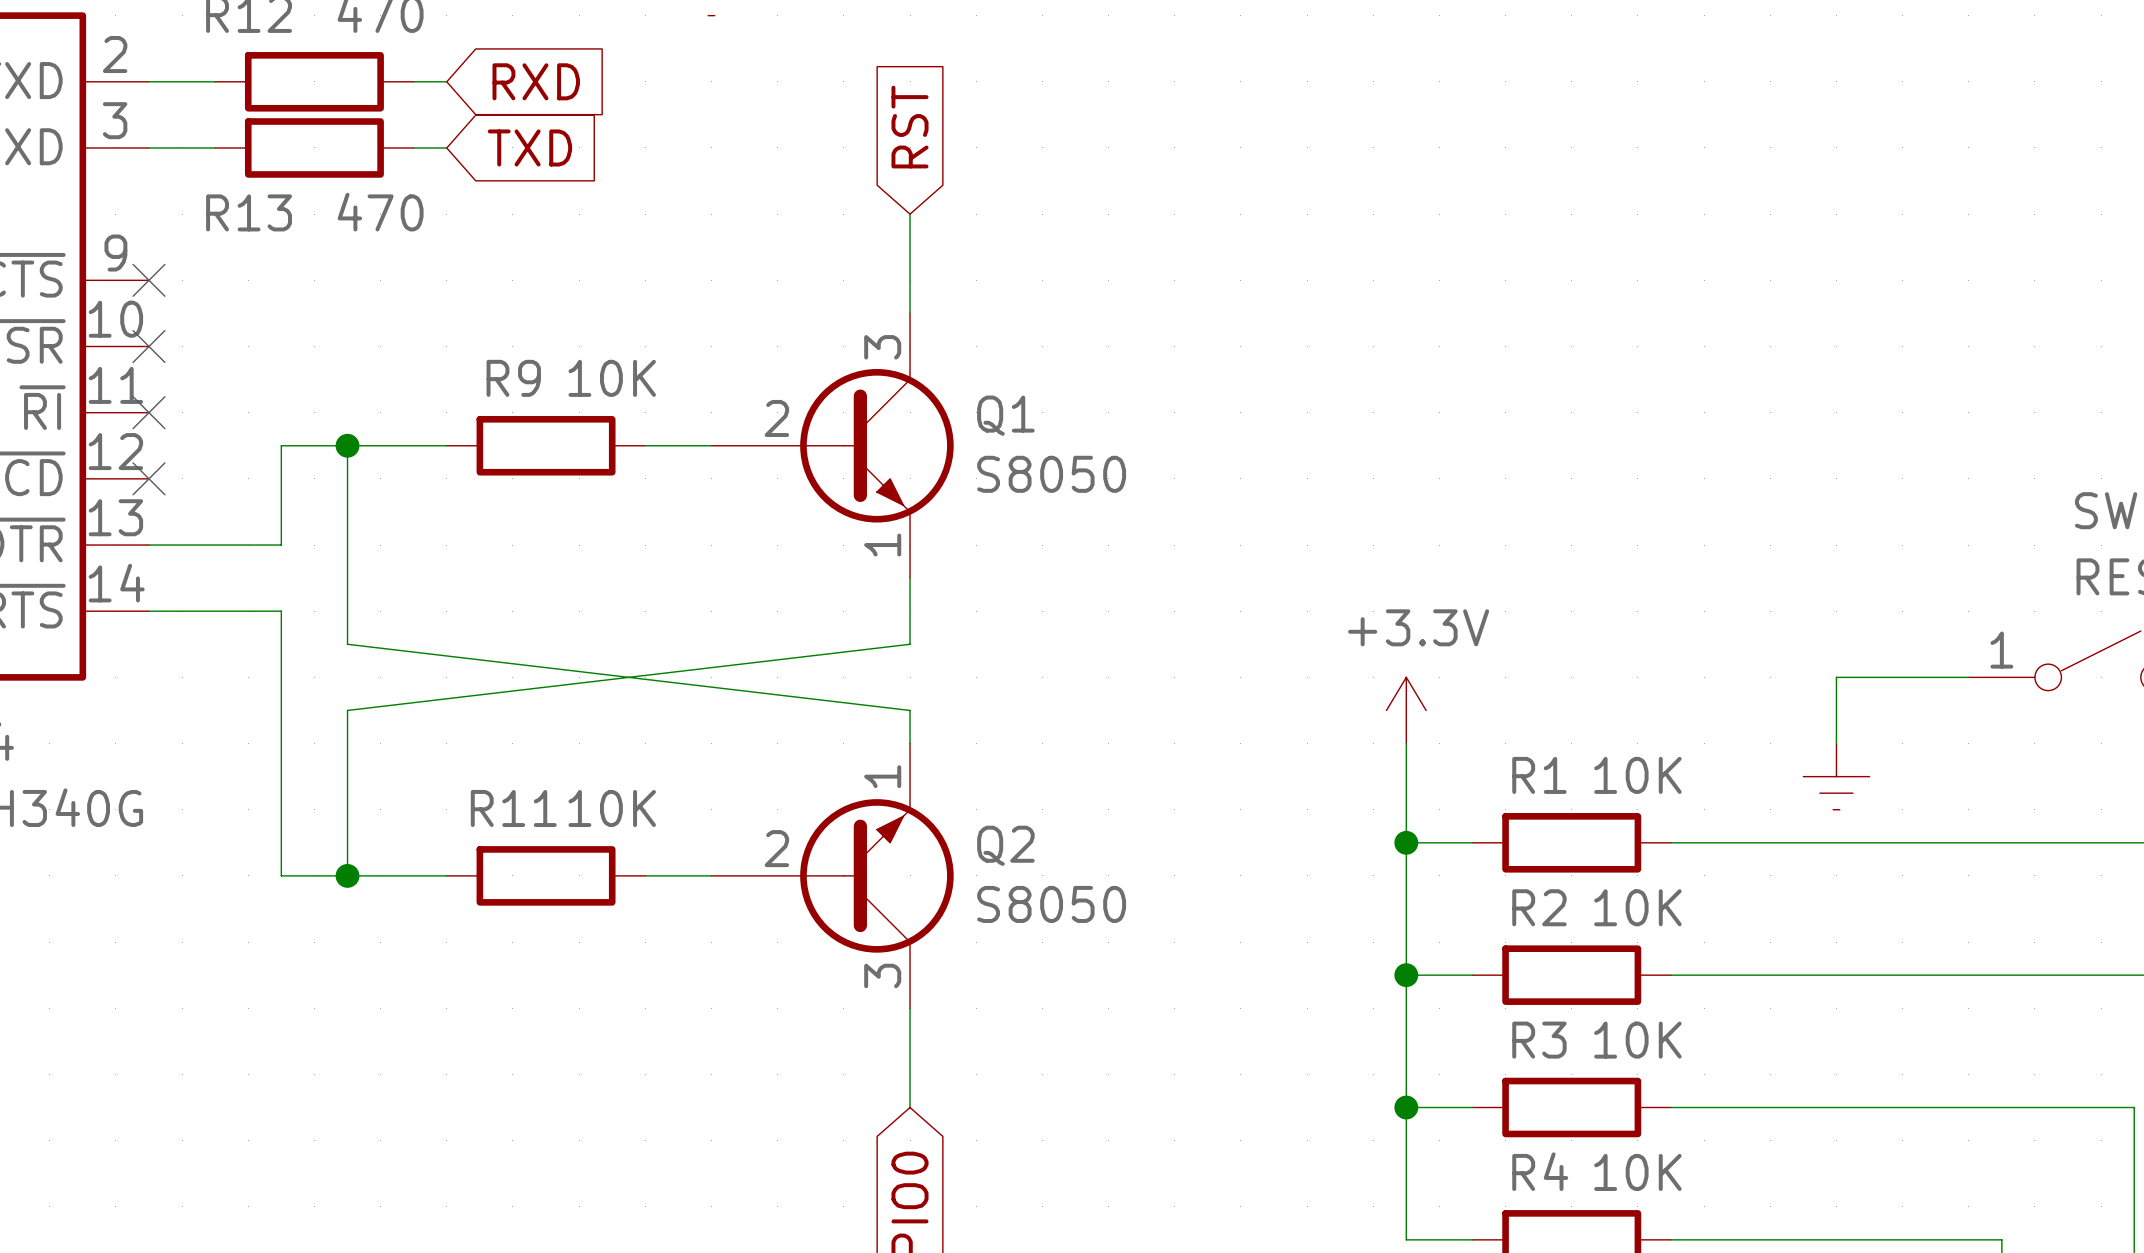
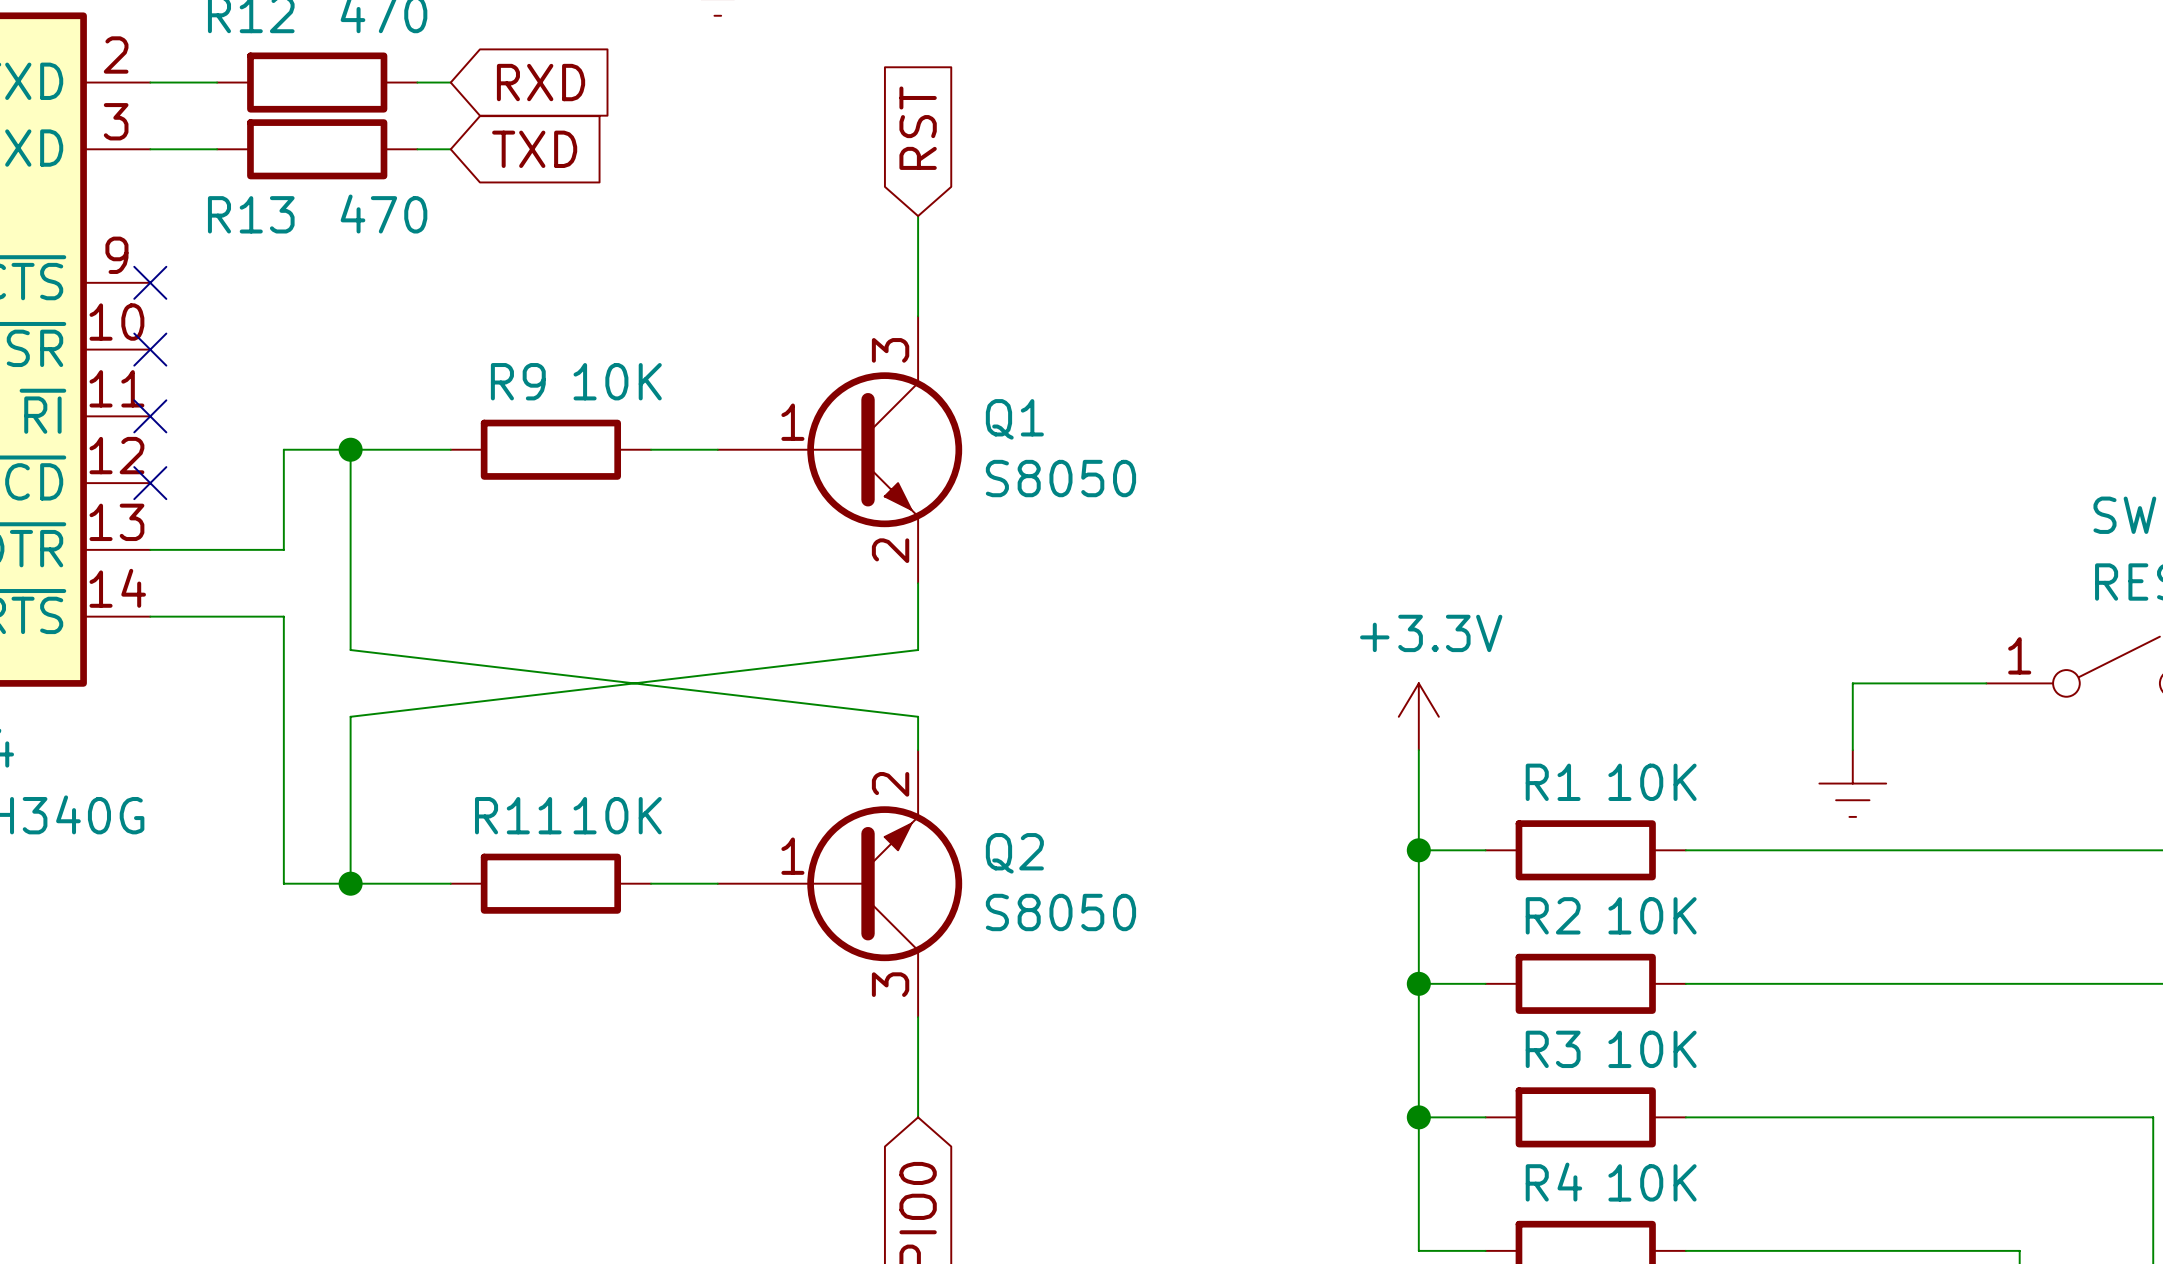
Q1 symbol: [711, 313, 954, 579] -> [717, 316, 963, 584]
Q2 symbol: [711, 743, 954, 1009] -> [717, 750, 963, 1018]

